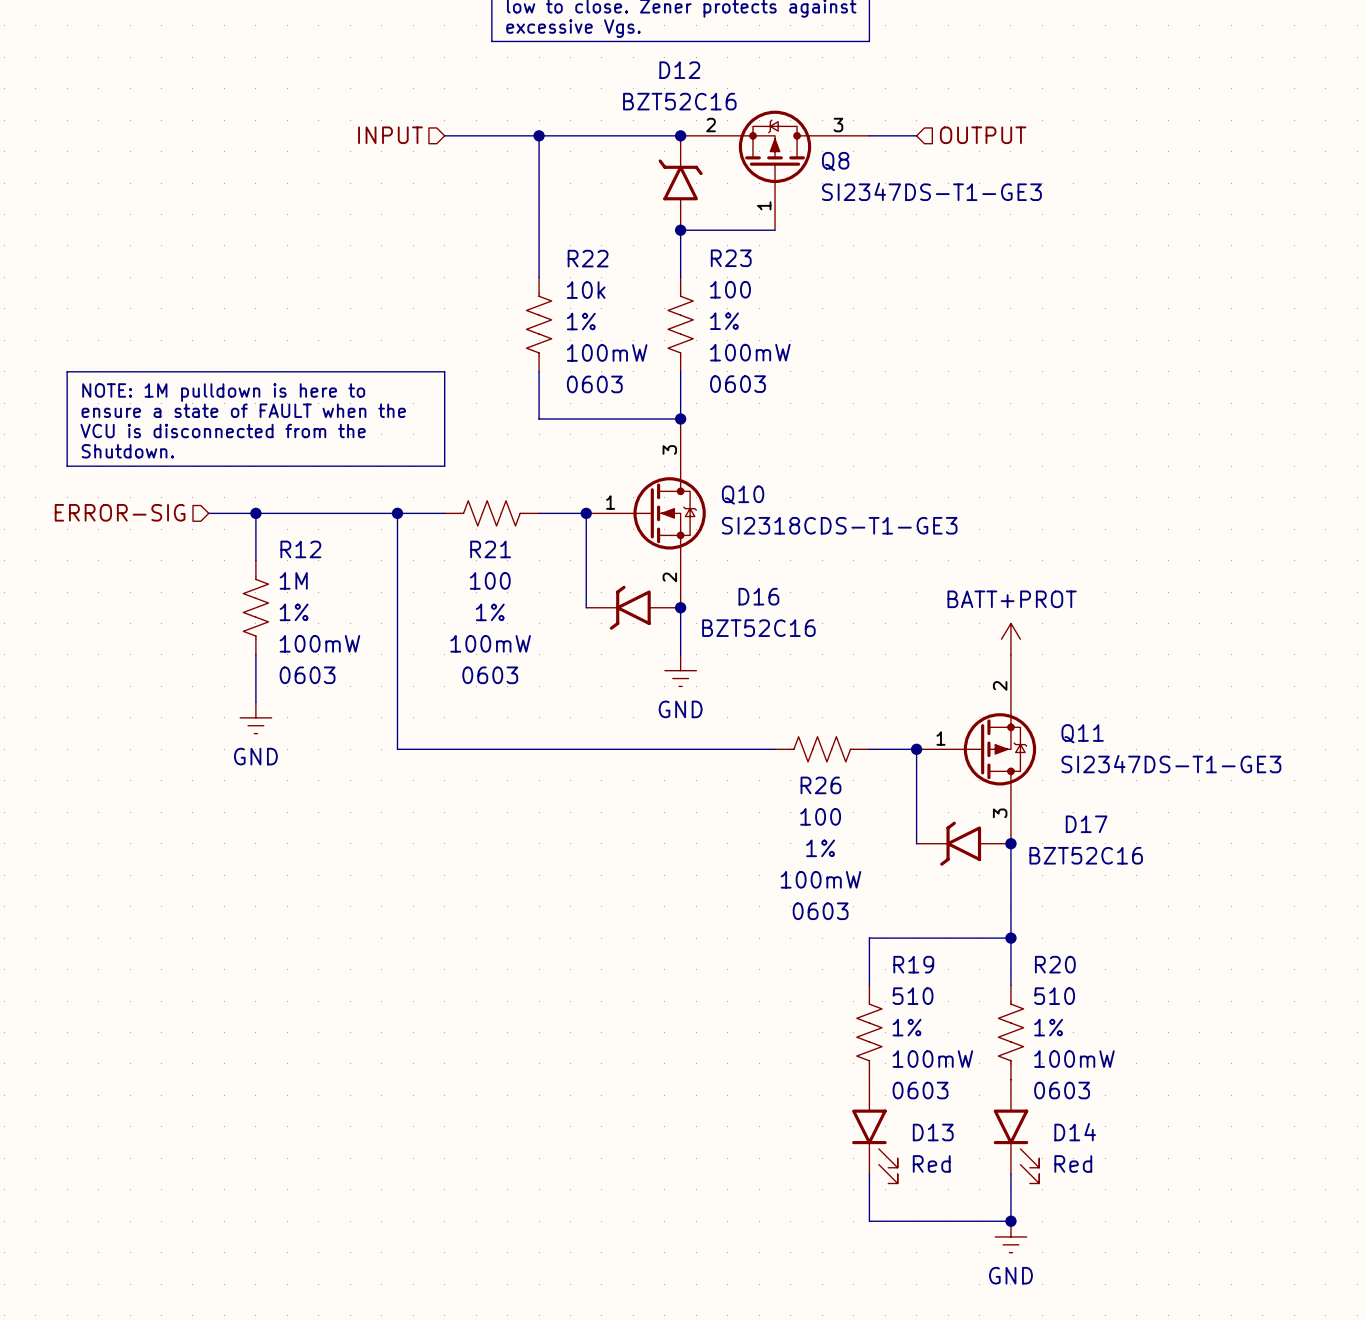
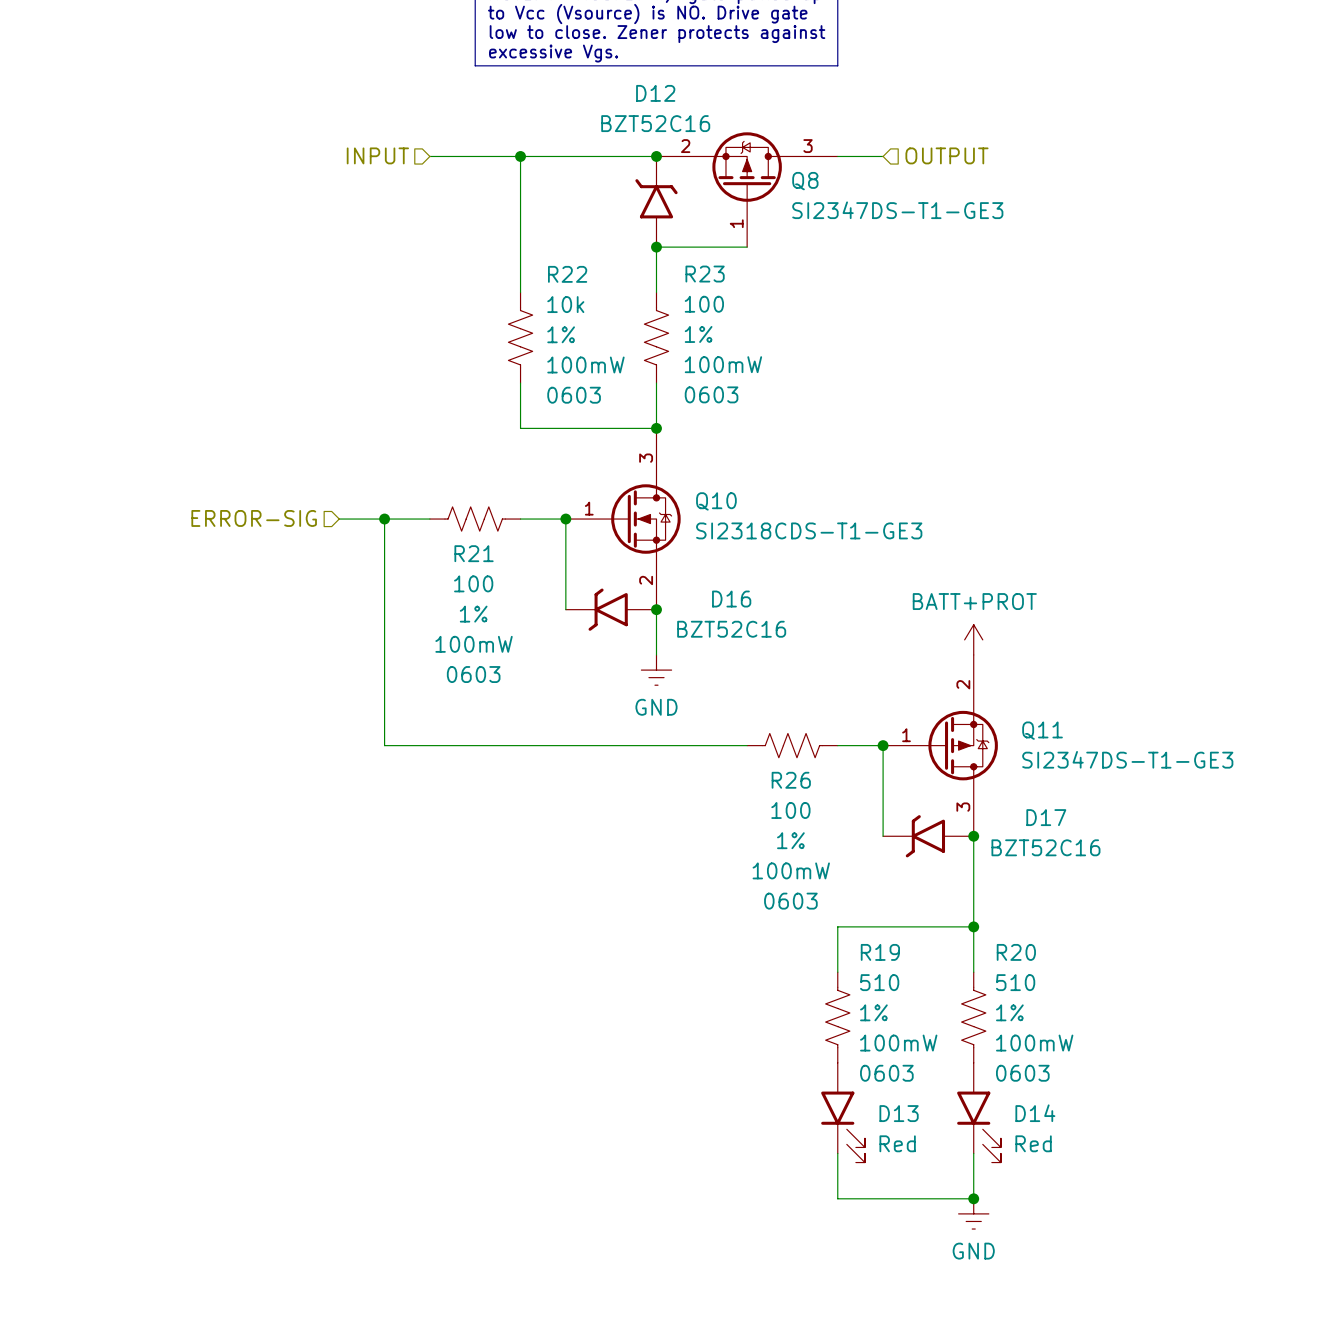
line: (67, 371) (444, 371) (444, 466) (67, 466) (67, 371) -> none
text: NOTE: 1M pulldown is here to (223, 392) -> none
text: ensure a state of FAULT when the (243, 410) -> none
text: VCU is disconnected from the (223, 431) -> none
text: Shutdown. (127, 451) -> none
hierarchical label position: ERROR-SIG (120, 512) -> ERROR-SIG (254, 518)
wire: (208, 513) (350, 513) -> none
wire: (255, 513) (255, 560) -> none
junction: (255, 513) -> none
R12: 1M (255, 607) -> none
wire: (255, 654) (255, 702) -> none
power symbol: GND (255, 717) -> none

